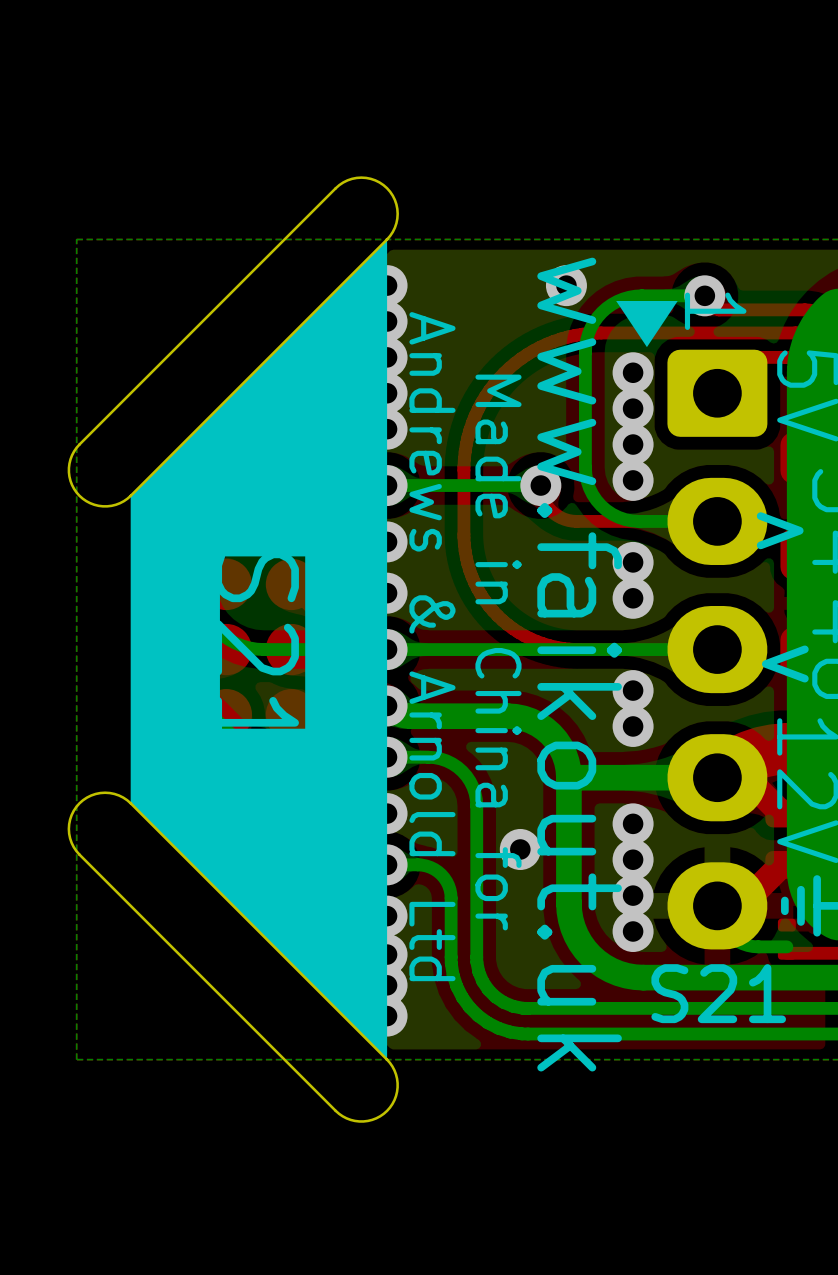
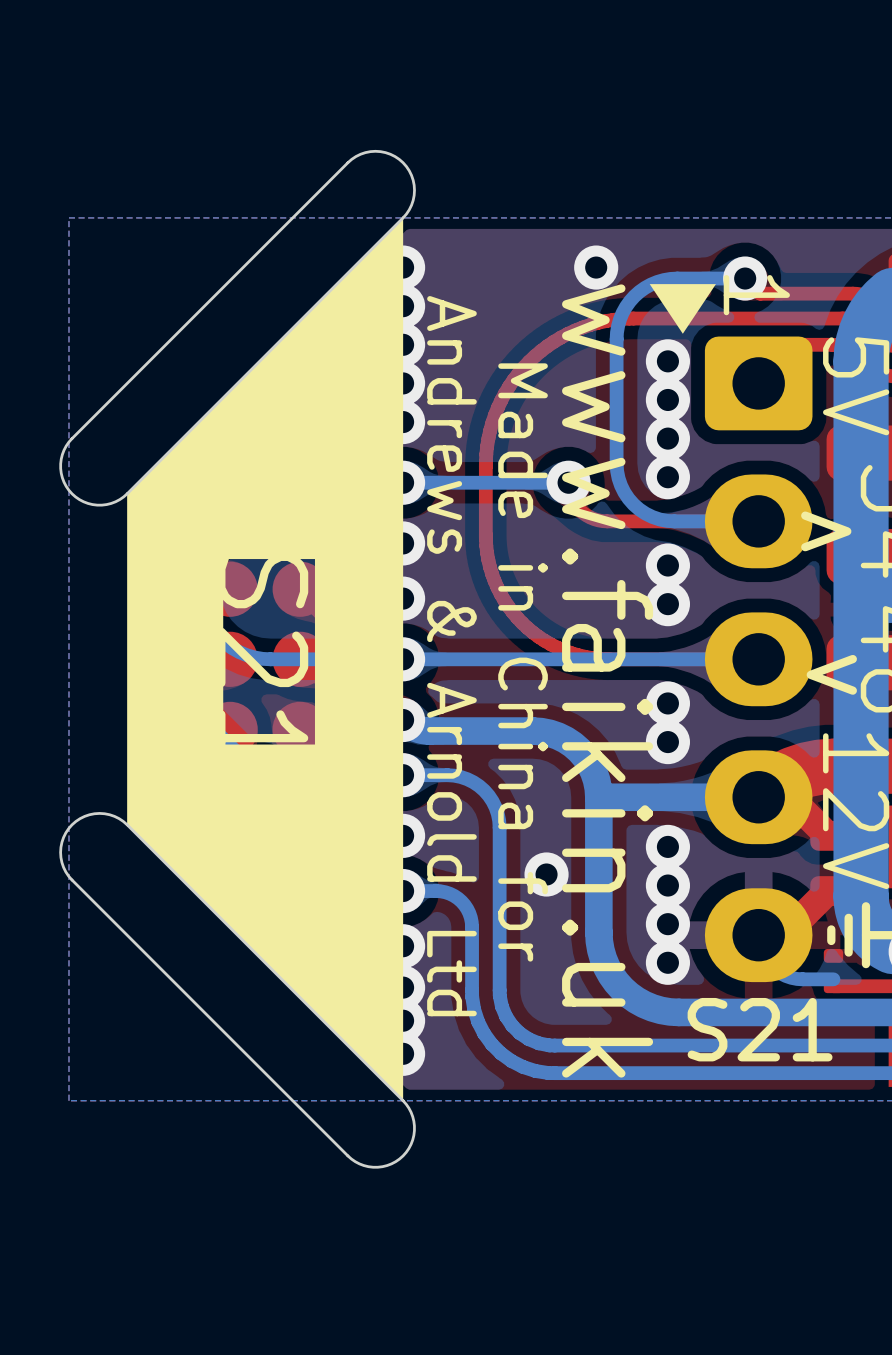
text position: www.f (579, 413) -> www.f (607, 452)
text: aikout.uk (579, 822) -> aikin.uk (607, 850)

